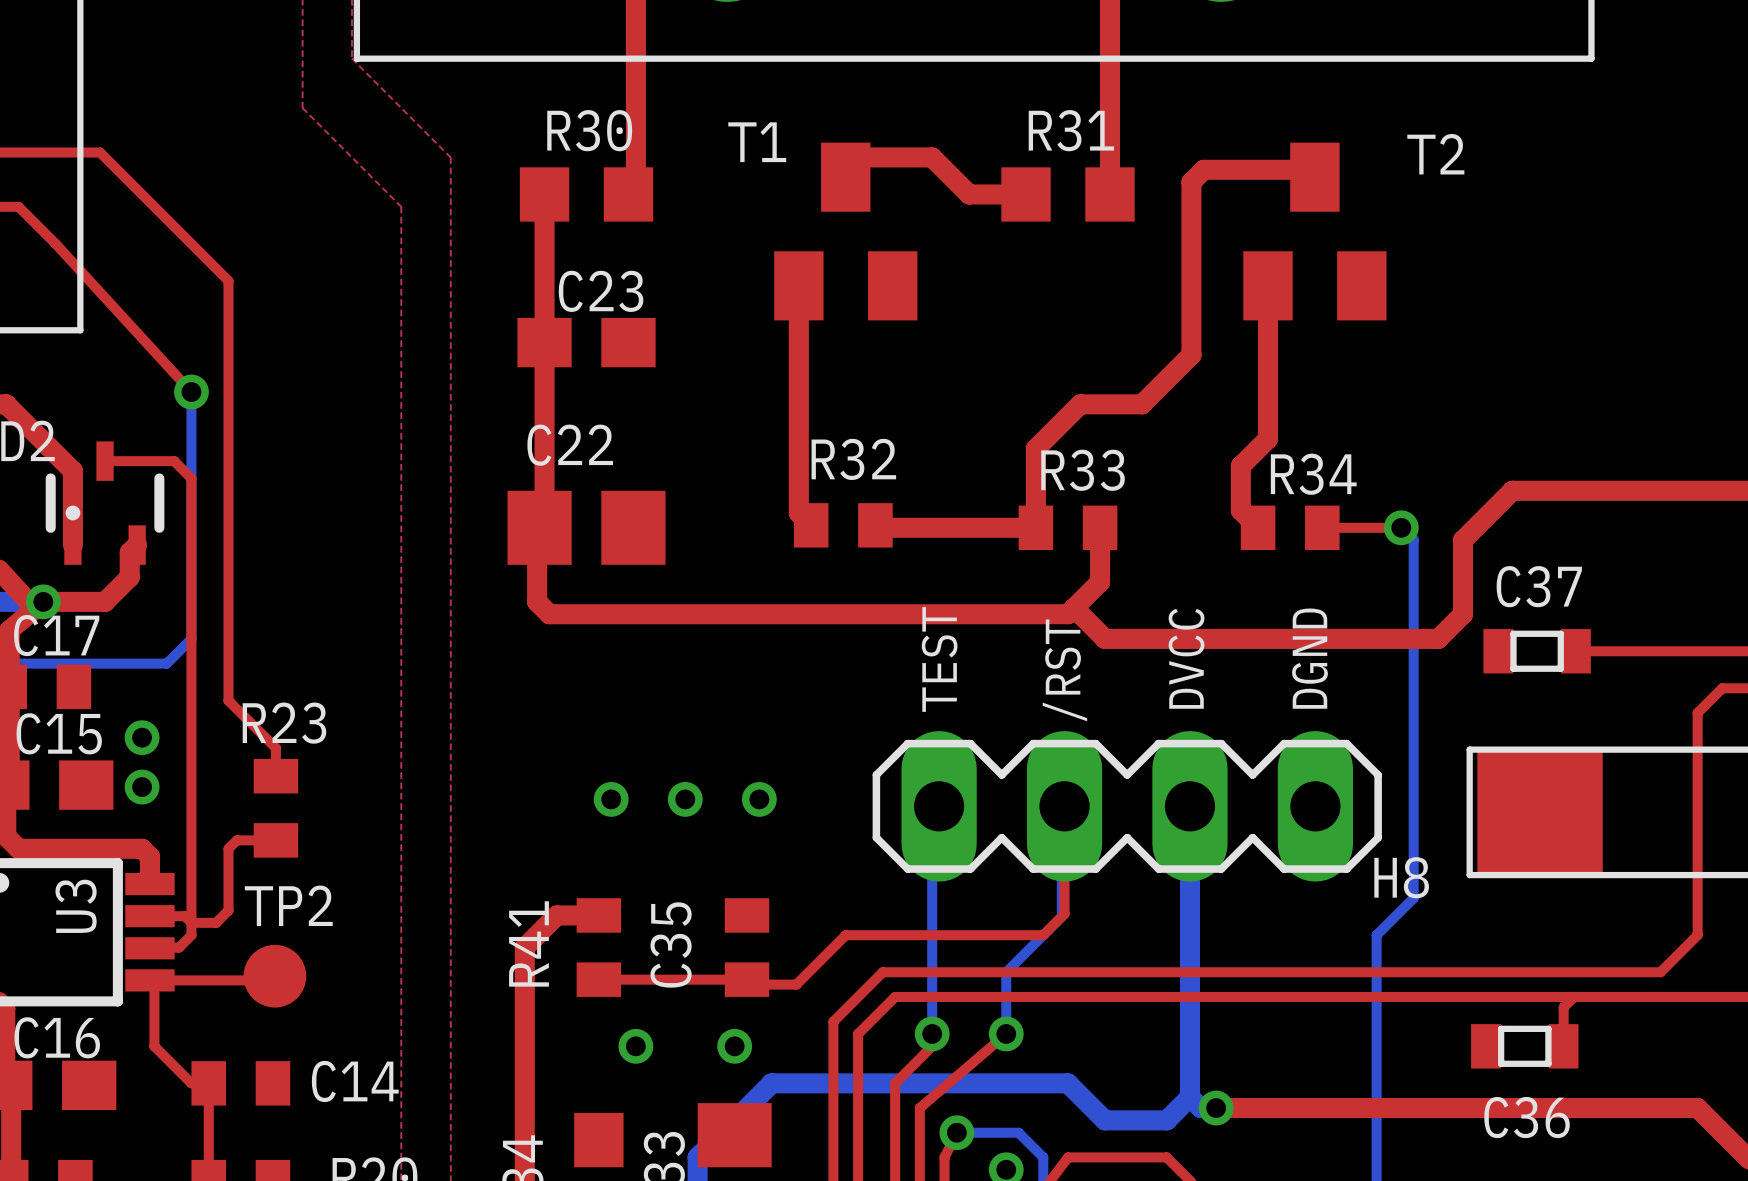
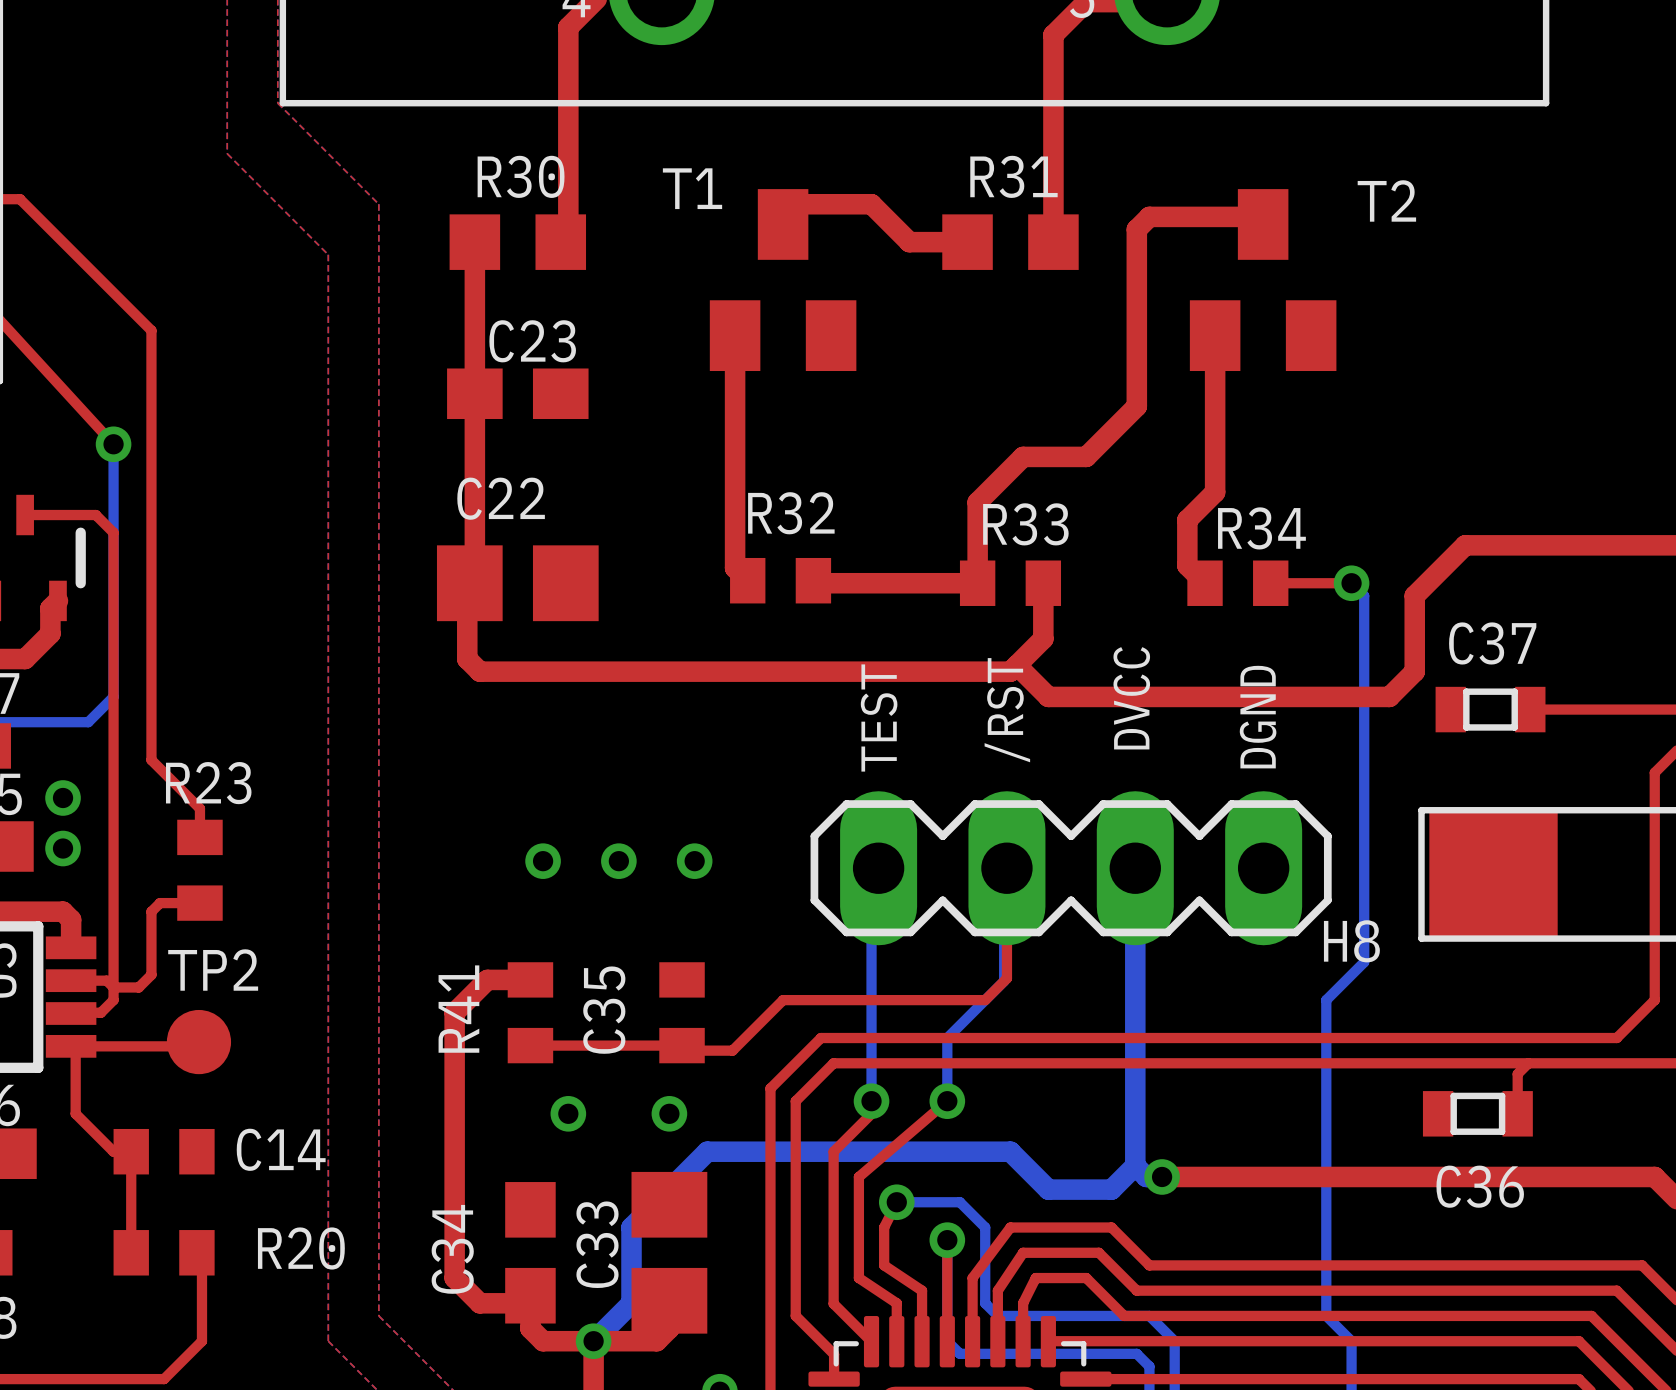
text position: DVCC (1186, 658) -> DVCC (1131, 698)
text position: /RST (1064, 670) -> /RST (1007, 710)

